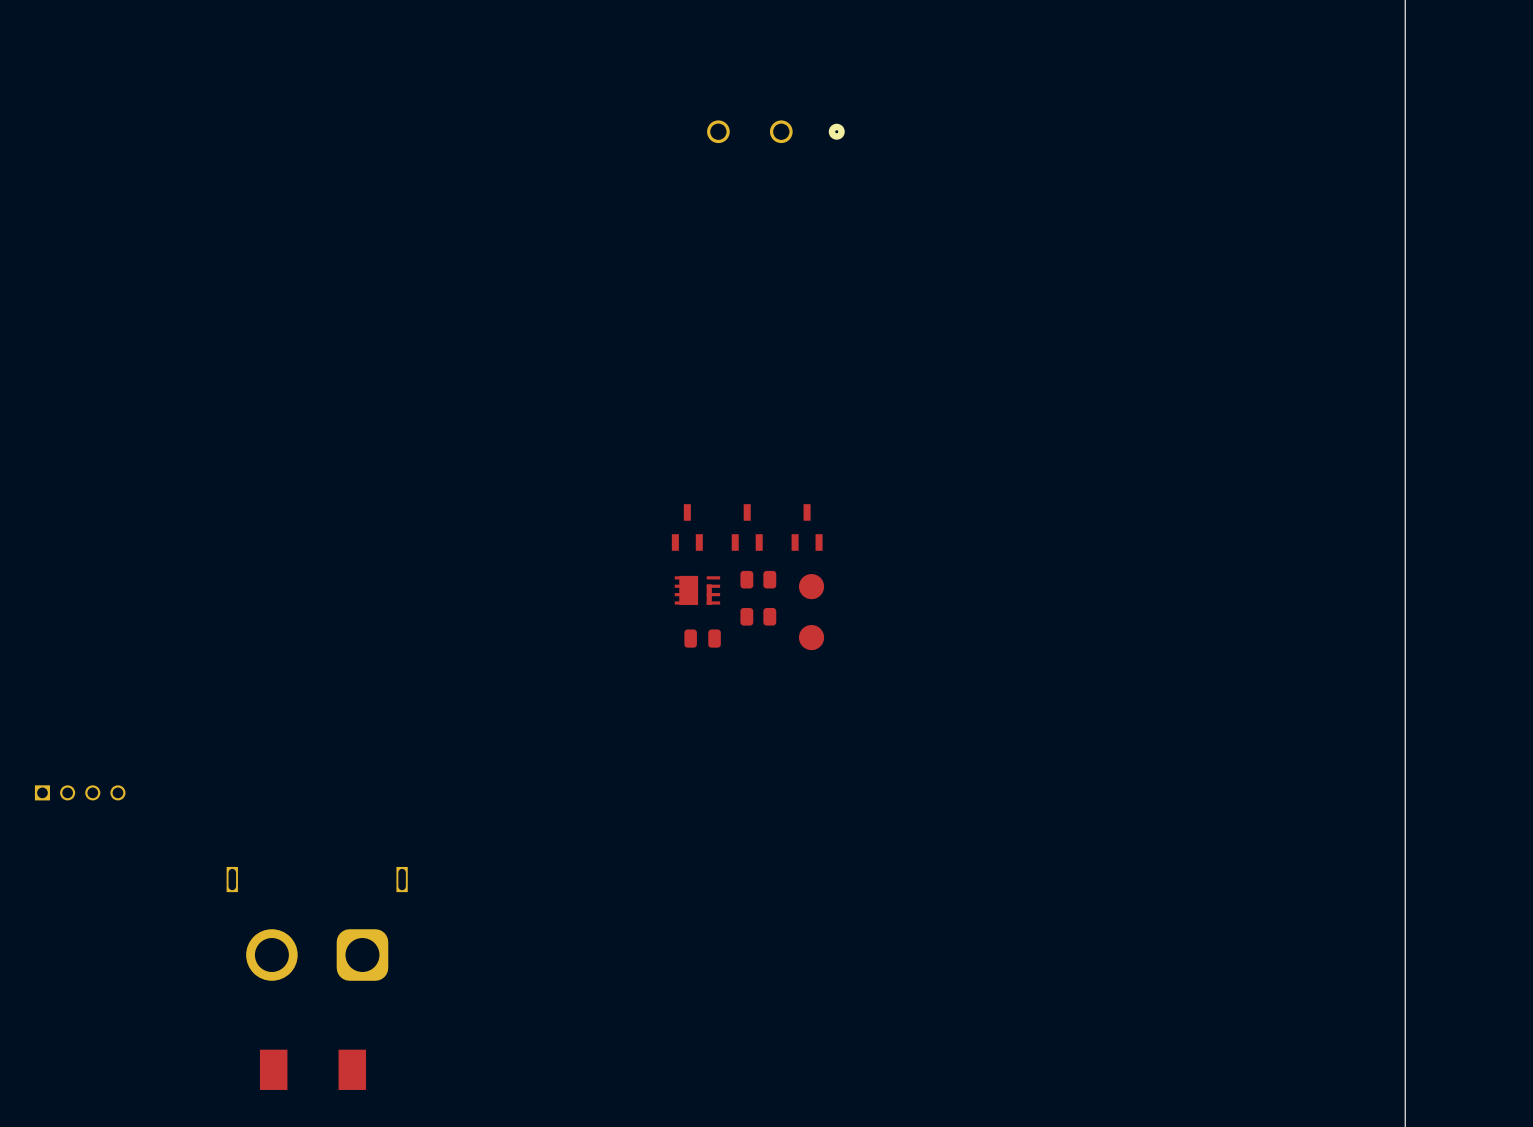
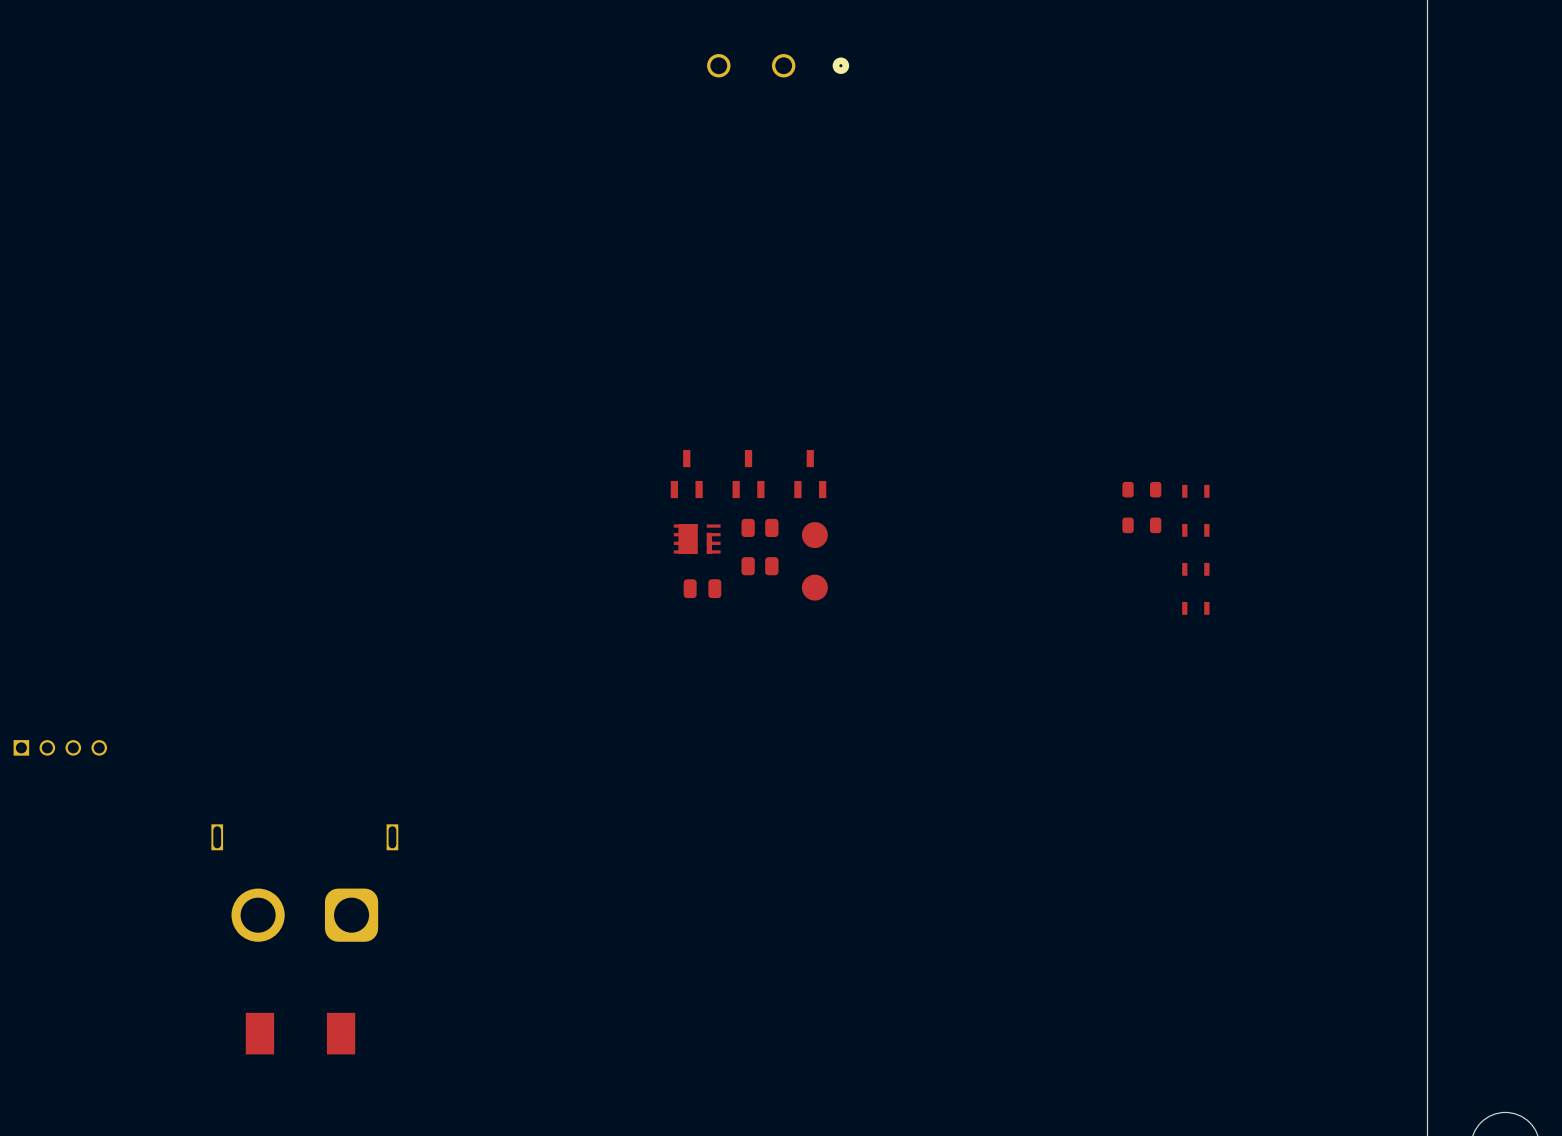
part: none -> (1141, 489)
part: none -> (1195, 491)
part: none -> (1141, 525)
part: none -> (1195, 530)
part: none -> (1195, 569)
part: none -> (1195, 608)

